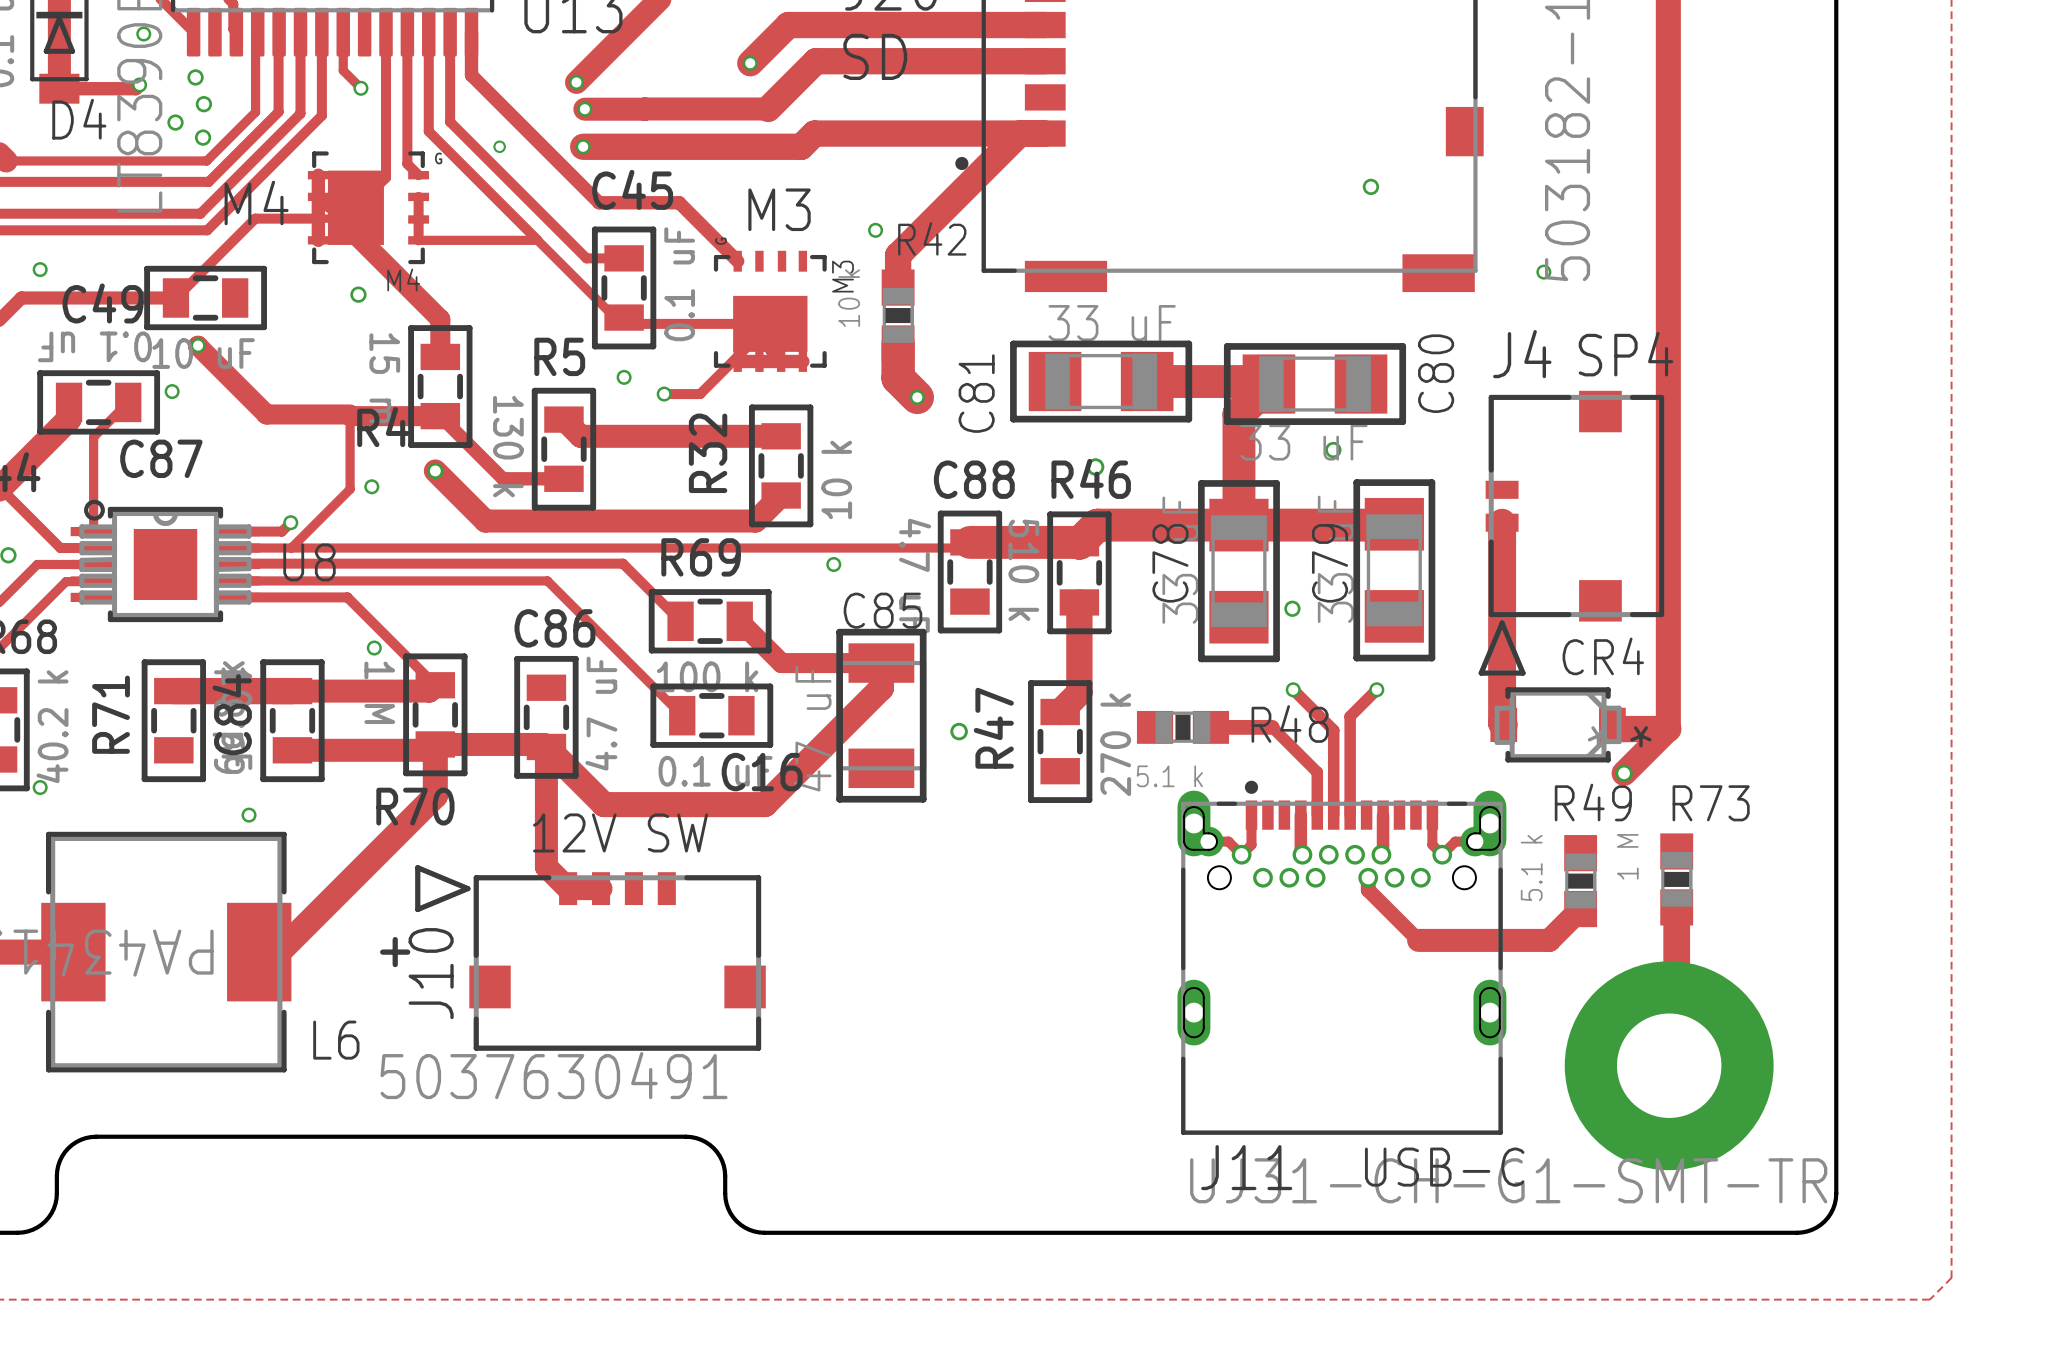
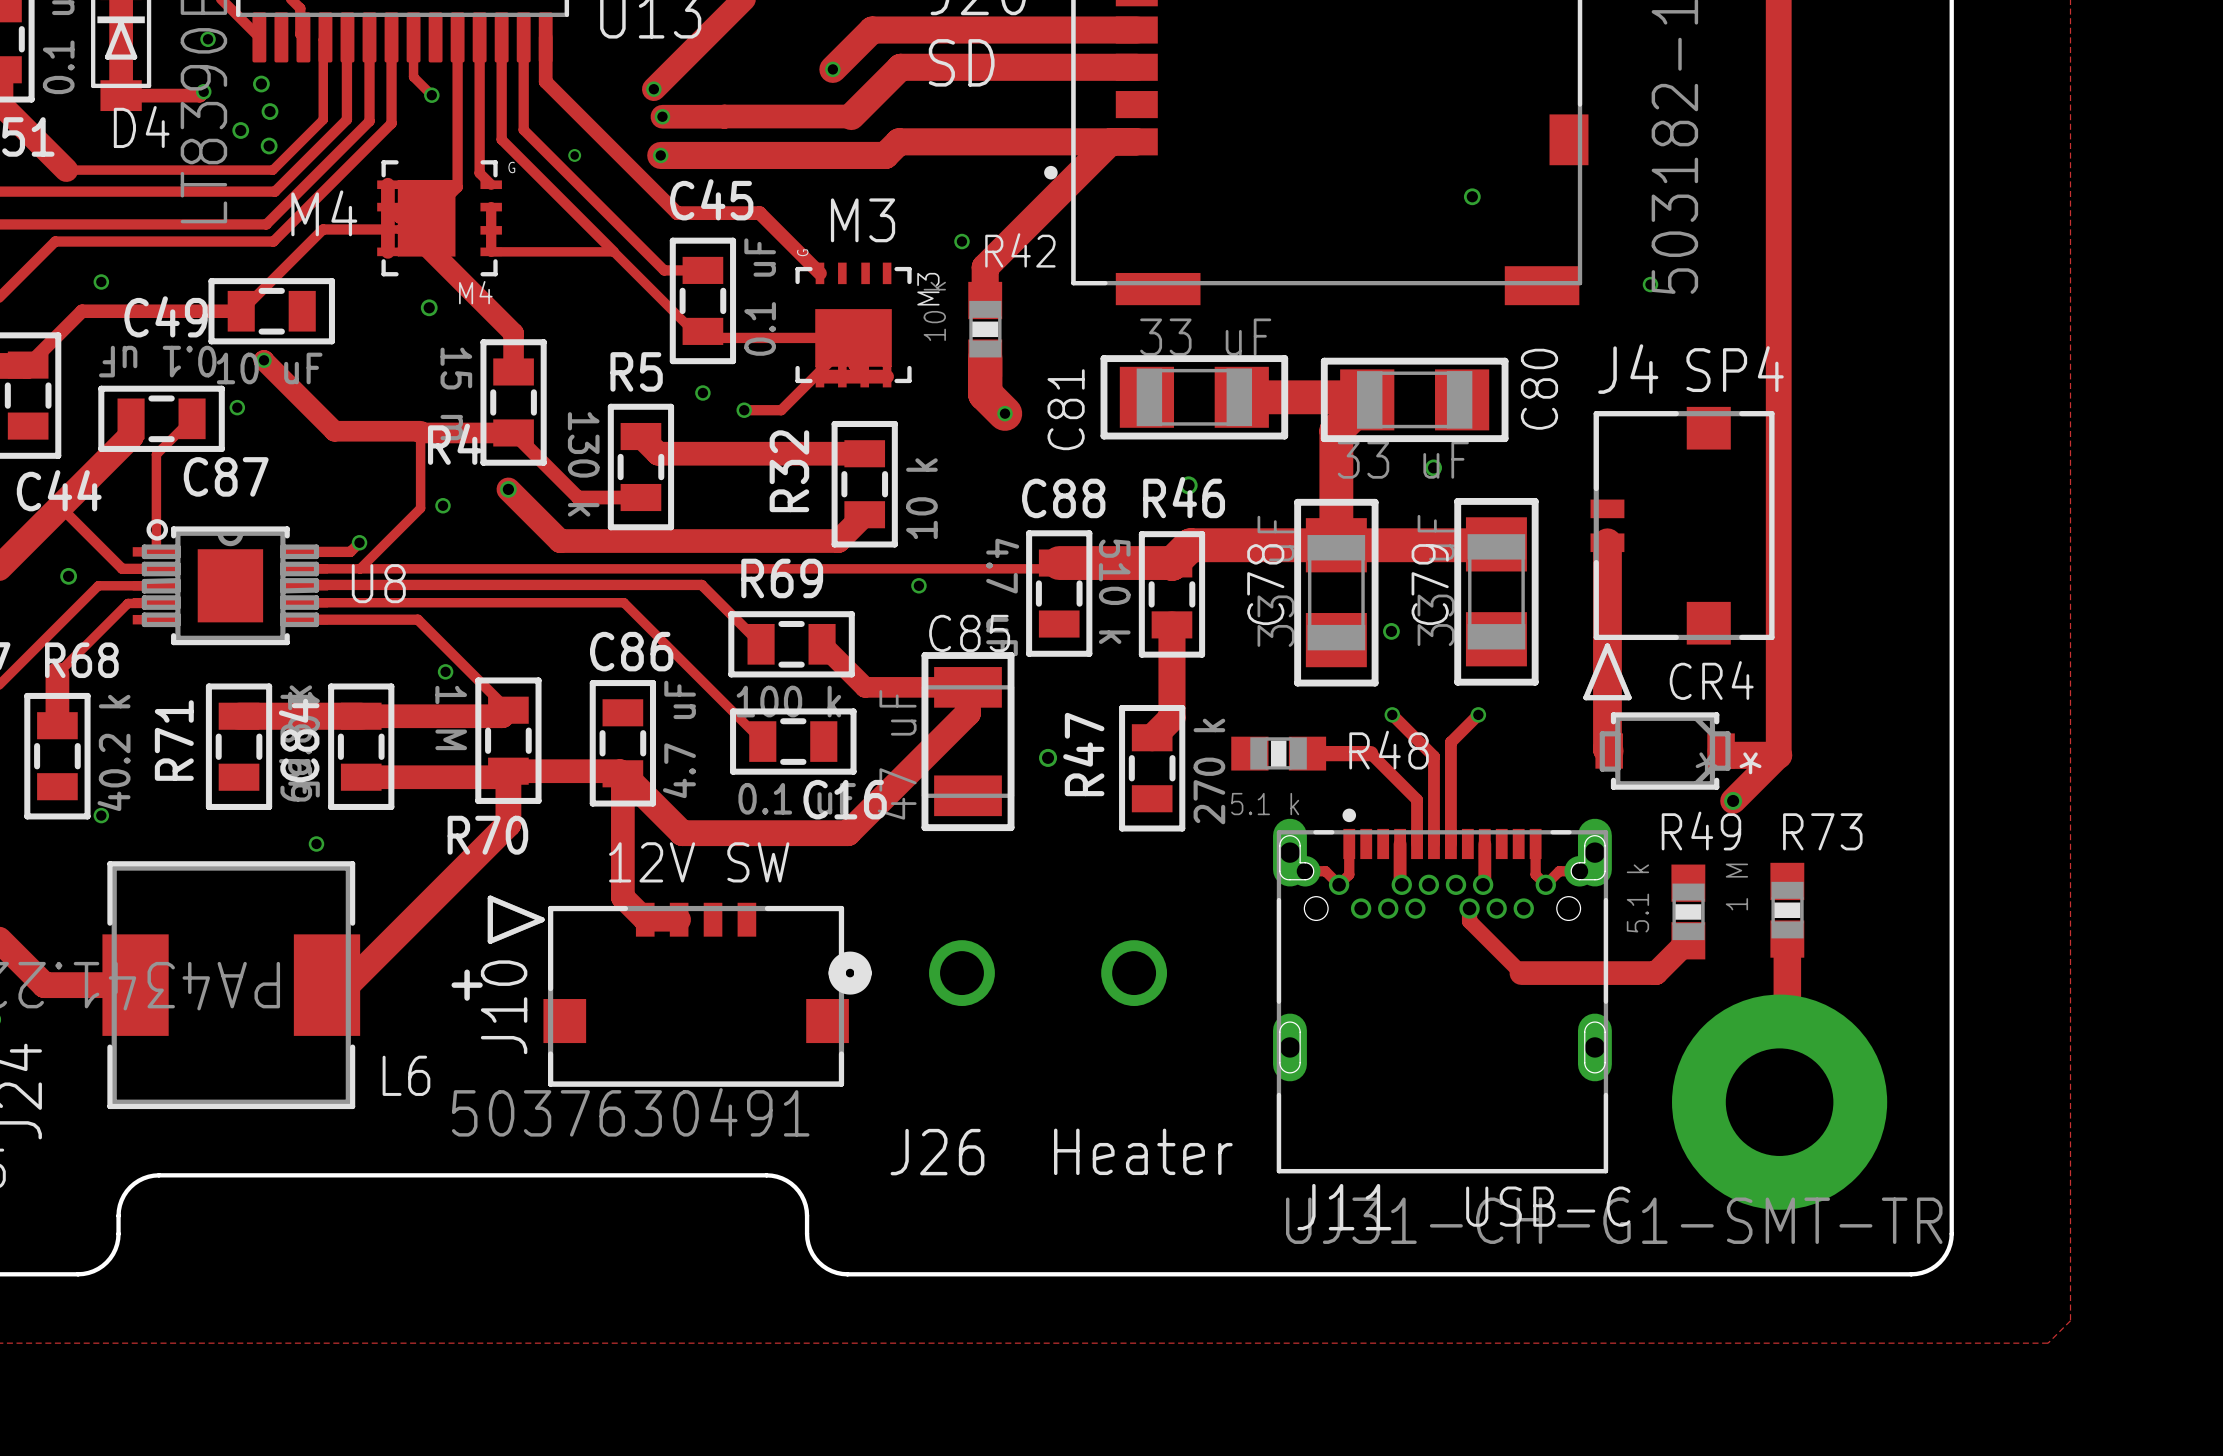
J26: none -> (997, 973)
text: none -> Heater (1143, 1151)

